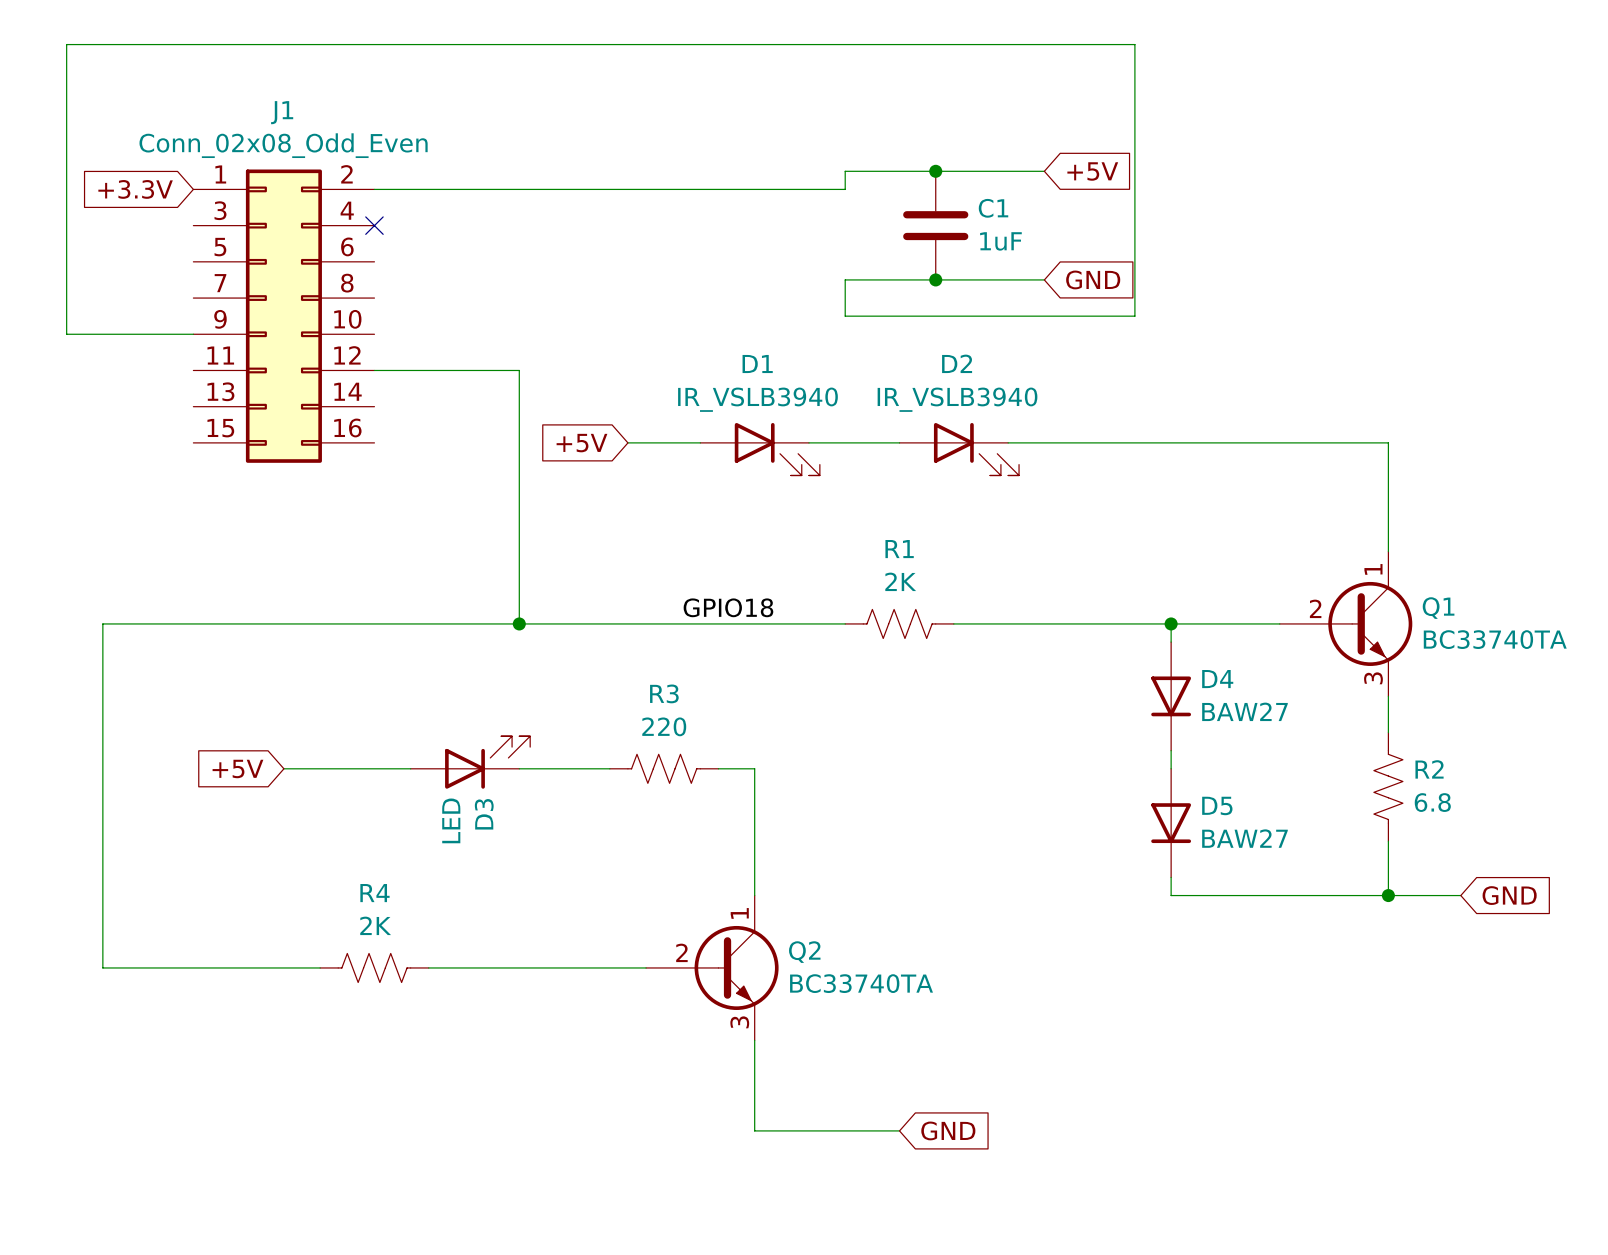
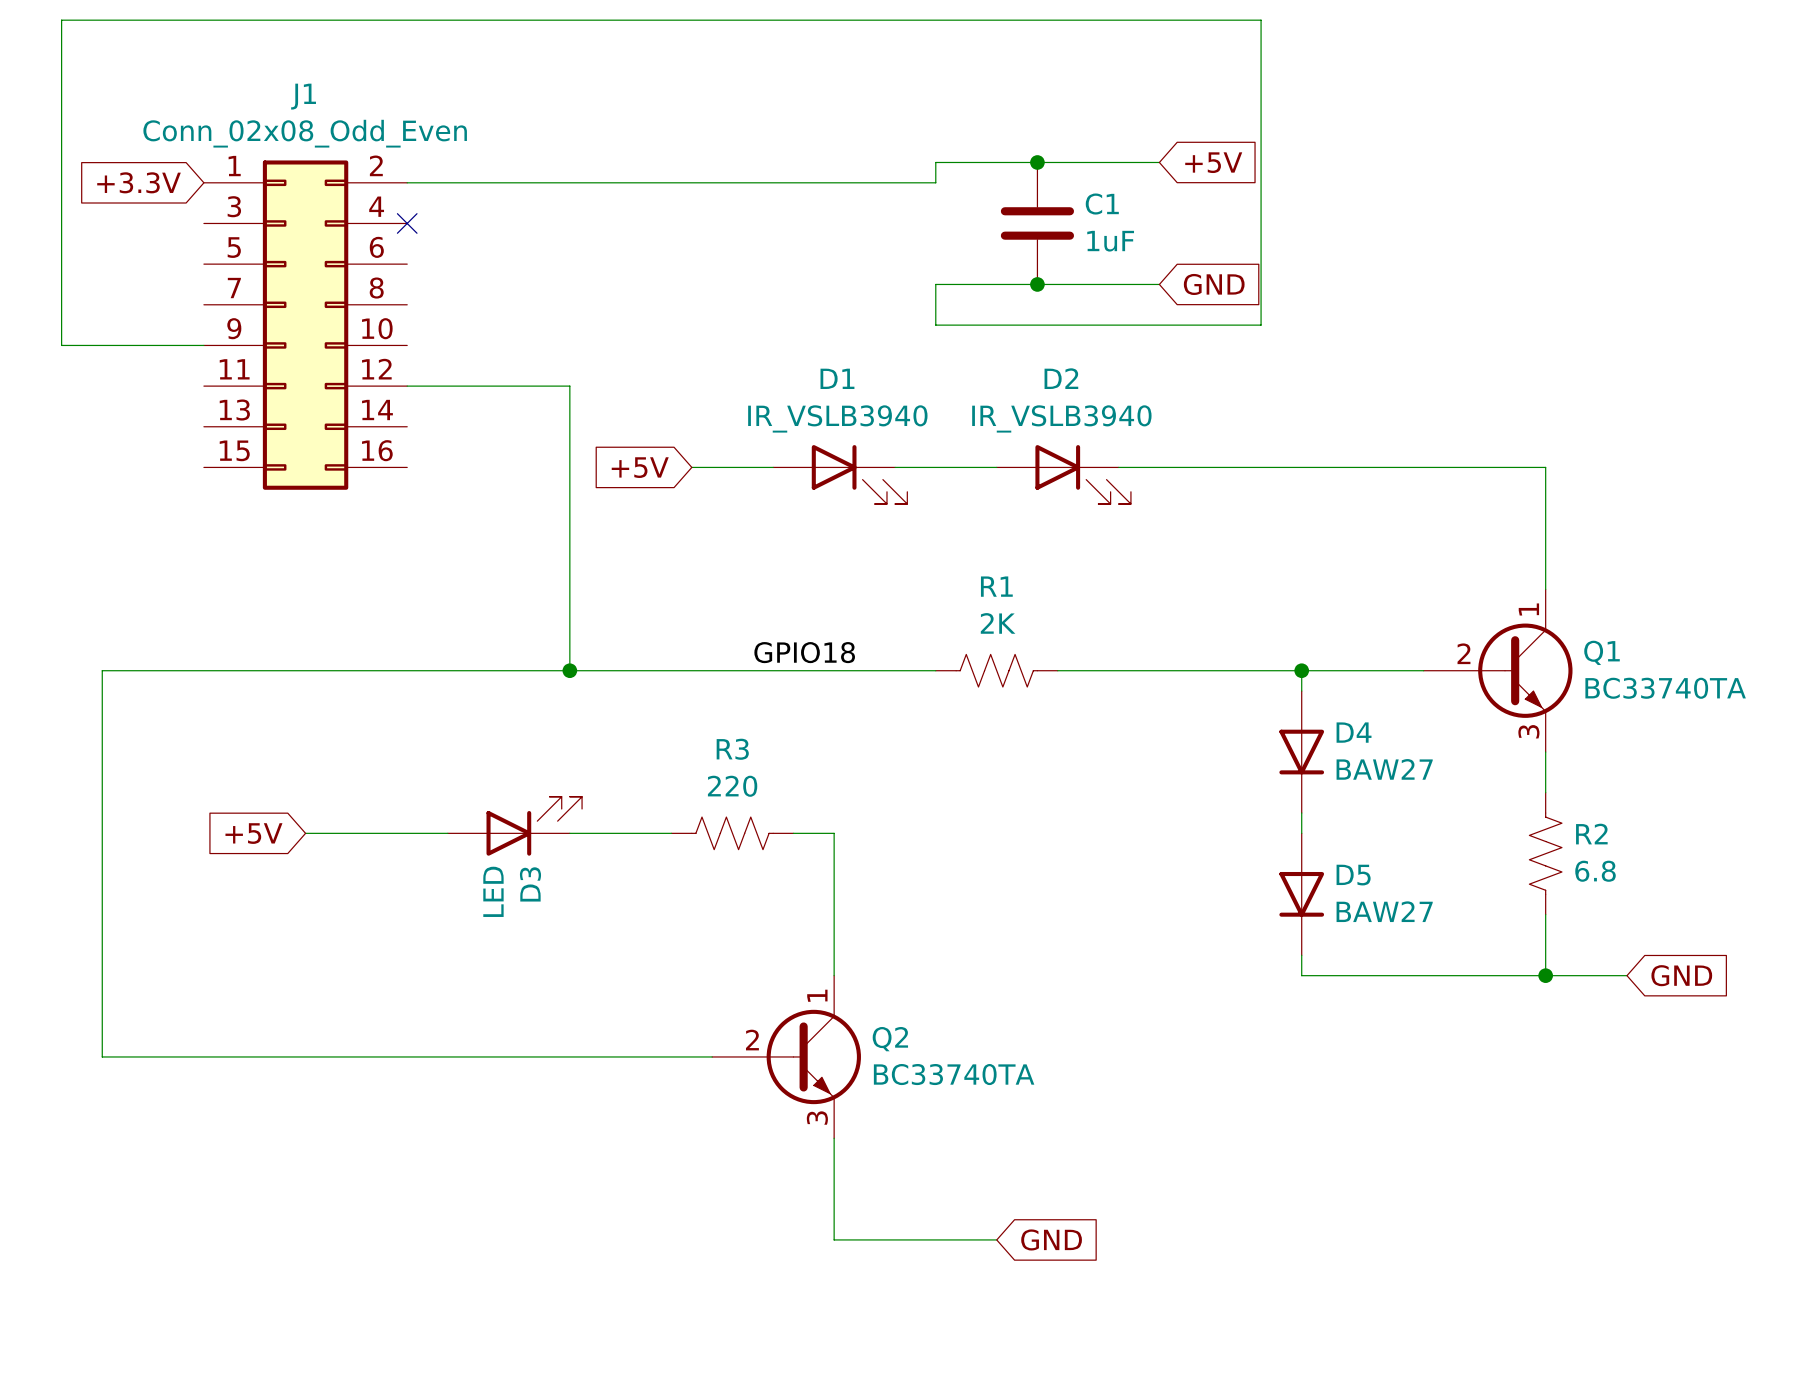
wire: none -> (346, 1056) (468, 1056)
R4: 2K (374, 967) -> none

